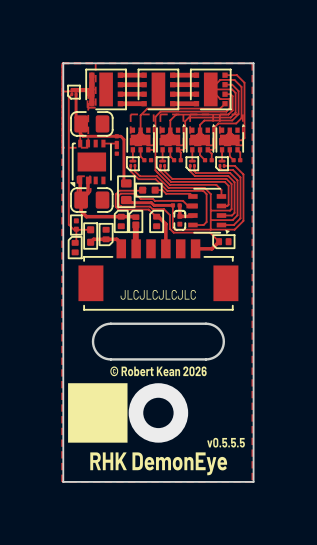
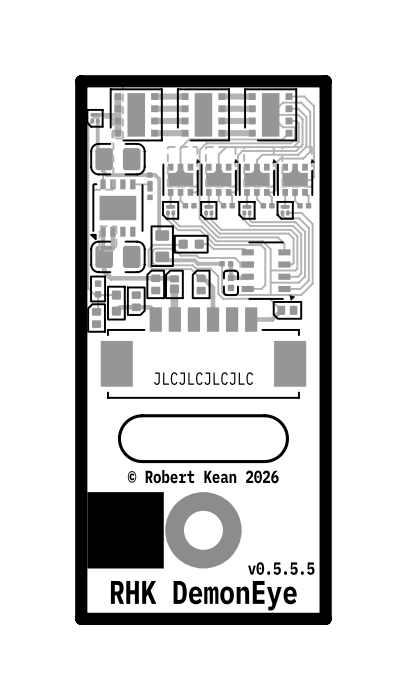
board edge width: thin (63, 63) (253, 63) (253, 481) (63, 481) (63, 63) -> thick (81, 81) (325, 81) (325, 618) (81, 618) (81, 81)

